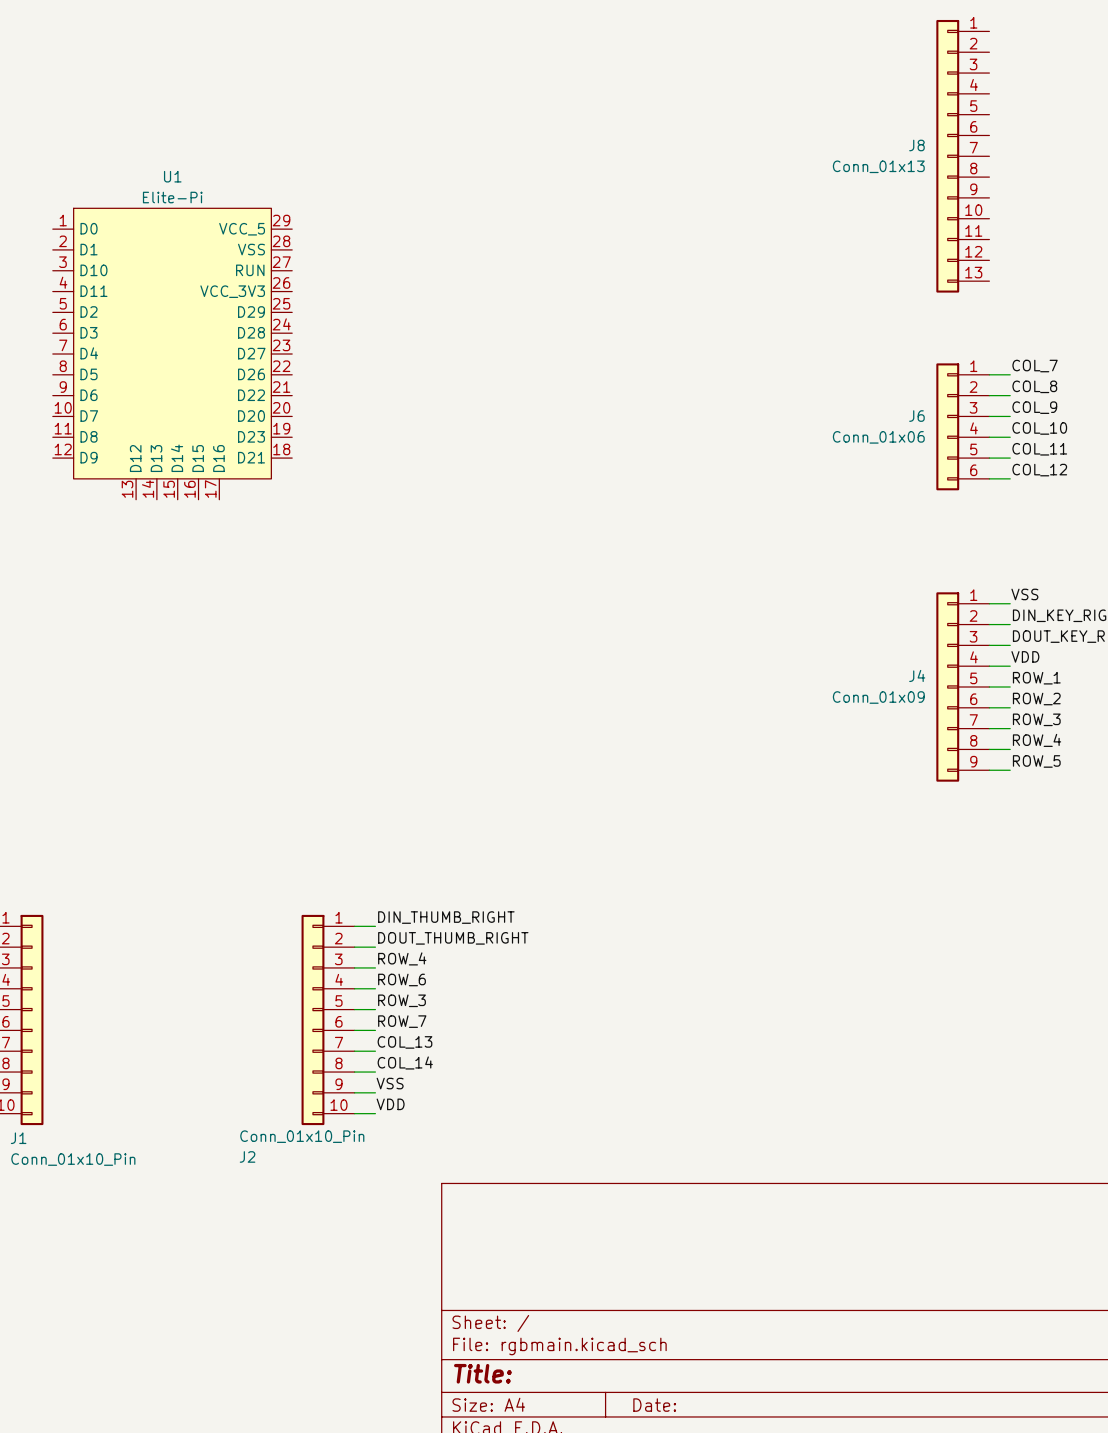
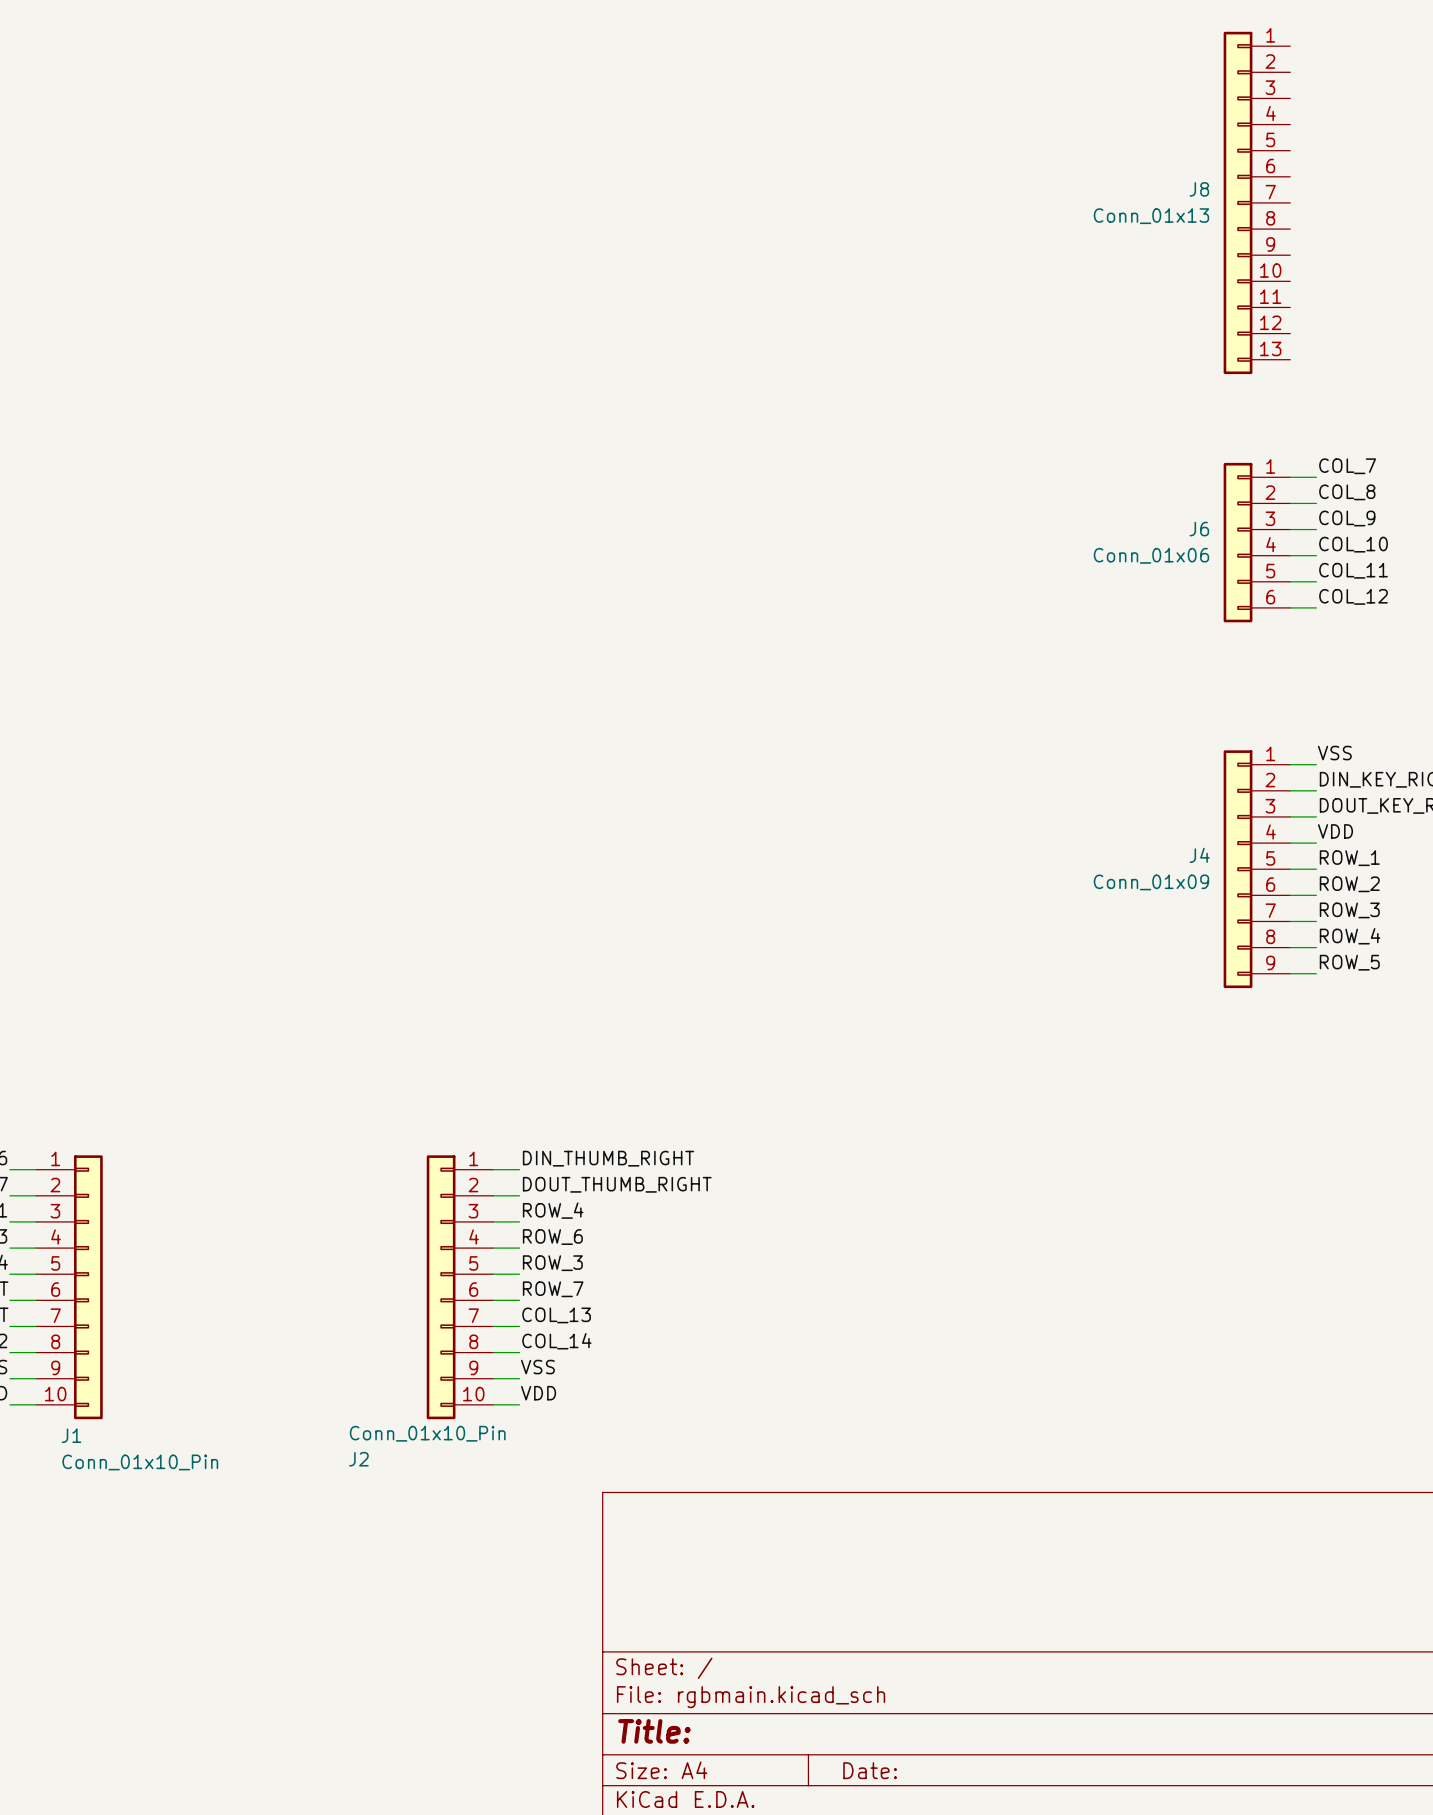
U1: Elite-Pi (172, 354) -> none

